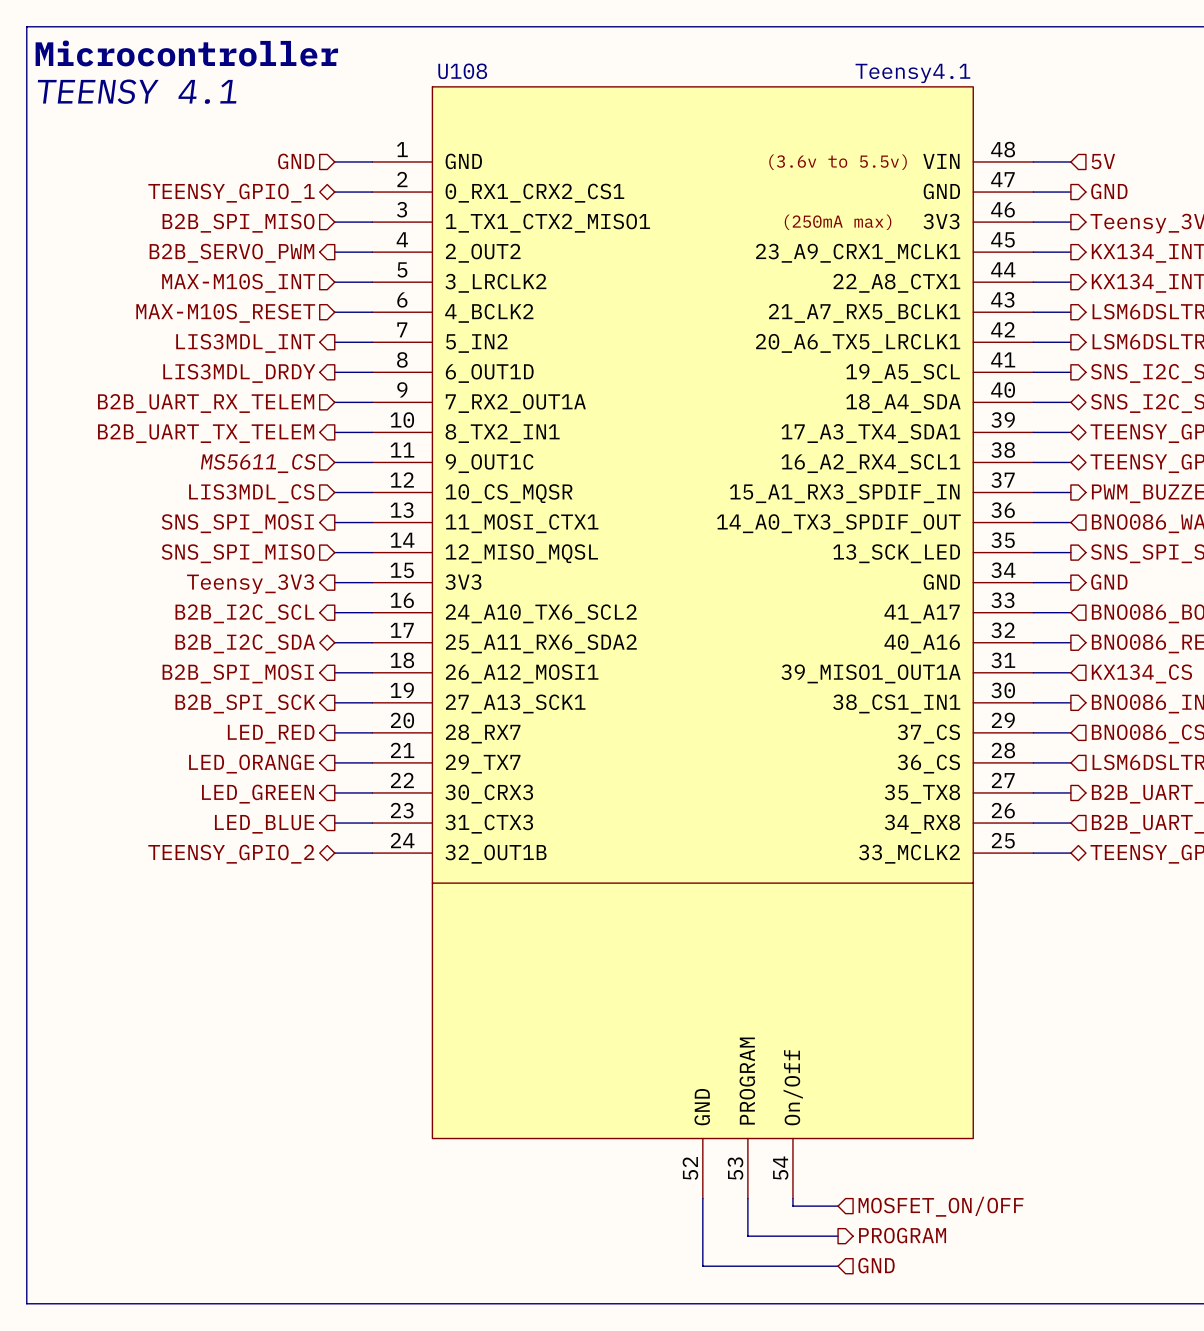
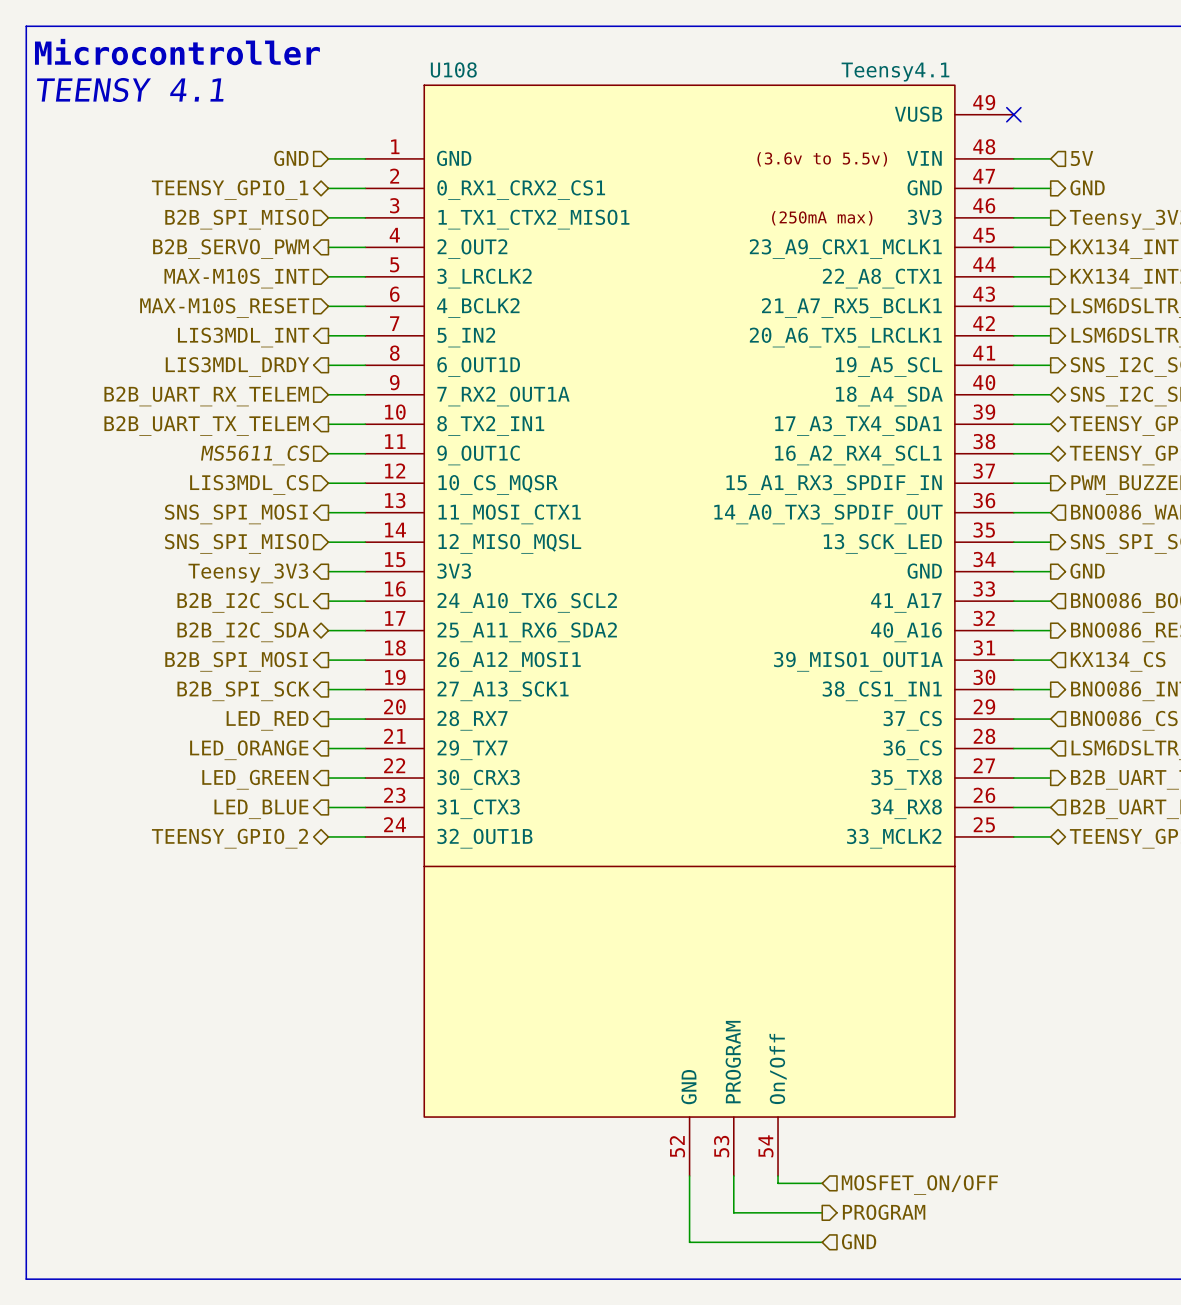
U108 symbol: [372, 86, 1034, 1199] -> [365, 85, 1014, 1176]
no-connect mark: none -> (1013, 114)

